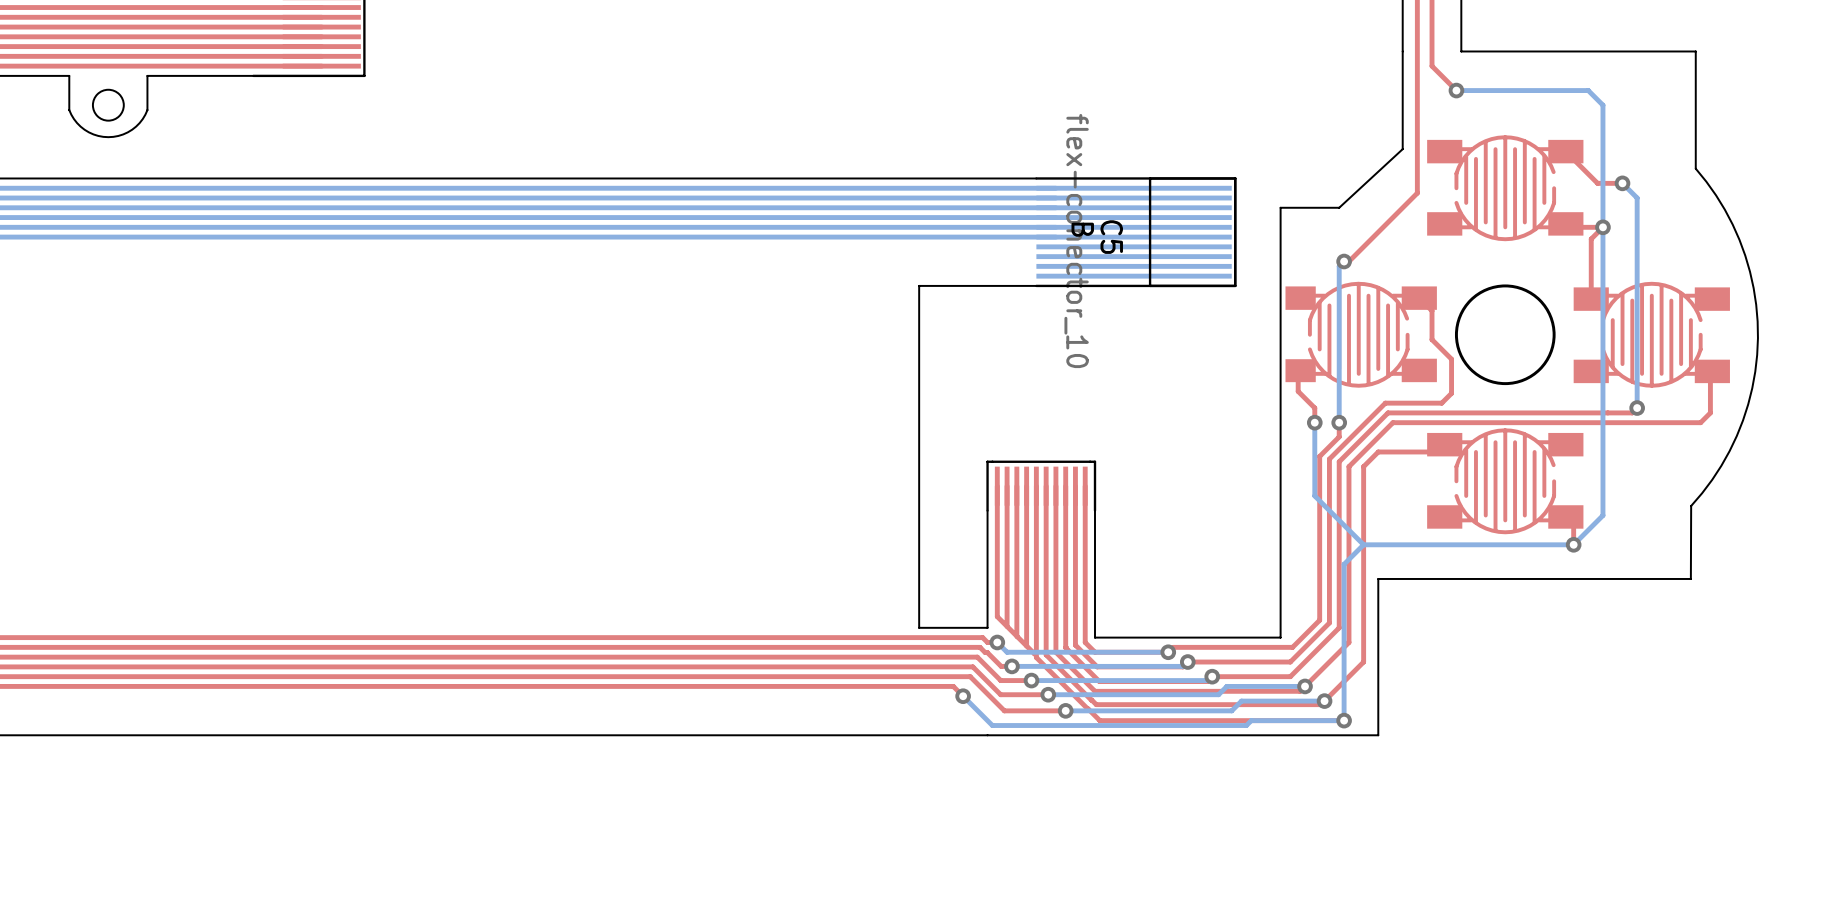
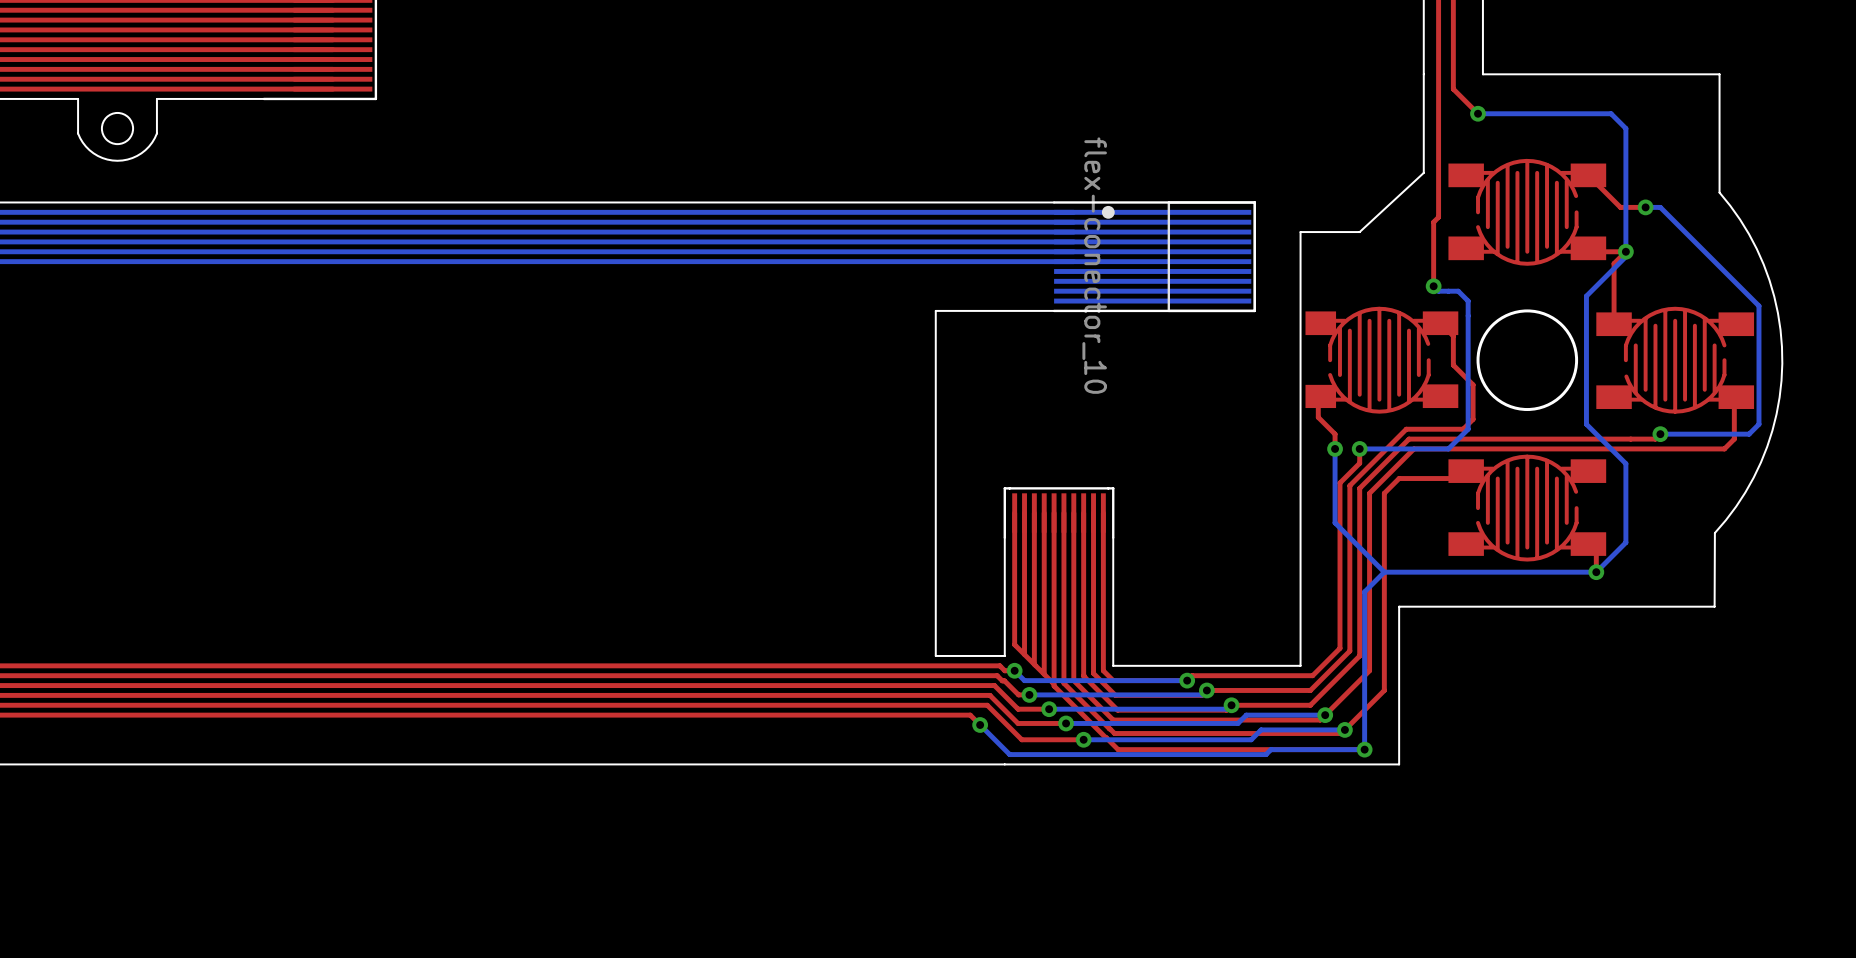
drawing: none -> [1101, 205, 1115, 219]
bottom track: (1622, 183) (1637, 198) (1637, 408) -> (1645, 207) (1660, 207) (1758, 305) (1758, 424) (1749, 434) (1660, 434)
top track: (1412, 198) (1348, 261) (1344, 261) -> (1433, 222) (1433, 286)
text: B (1082, 229) -> none
bottom track: (1602, 232) (1602, 437) -> (1625, 256) (1586, 296) (1586, 424) (1625, 463)
C5 name: C5 (1111, 237) -> none
bottom track: (1344, 261) (1339, 266) (1339, 422) -> (1433, 286) (1438, 291) (1458, 291) (1468, 301) (1468, 429) (1448, 448) (1359, 448)
via position: (1344, 261) -> (1433, 286)

